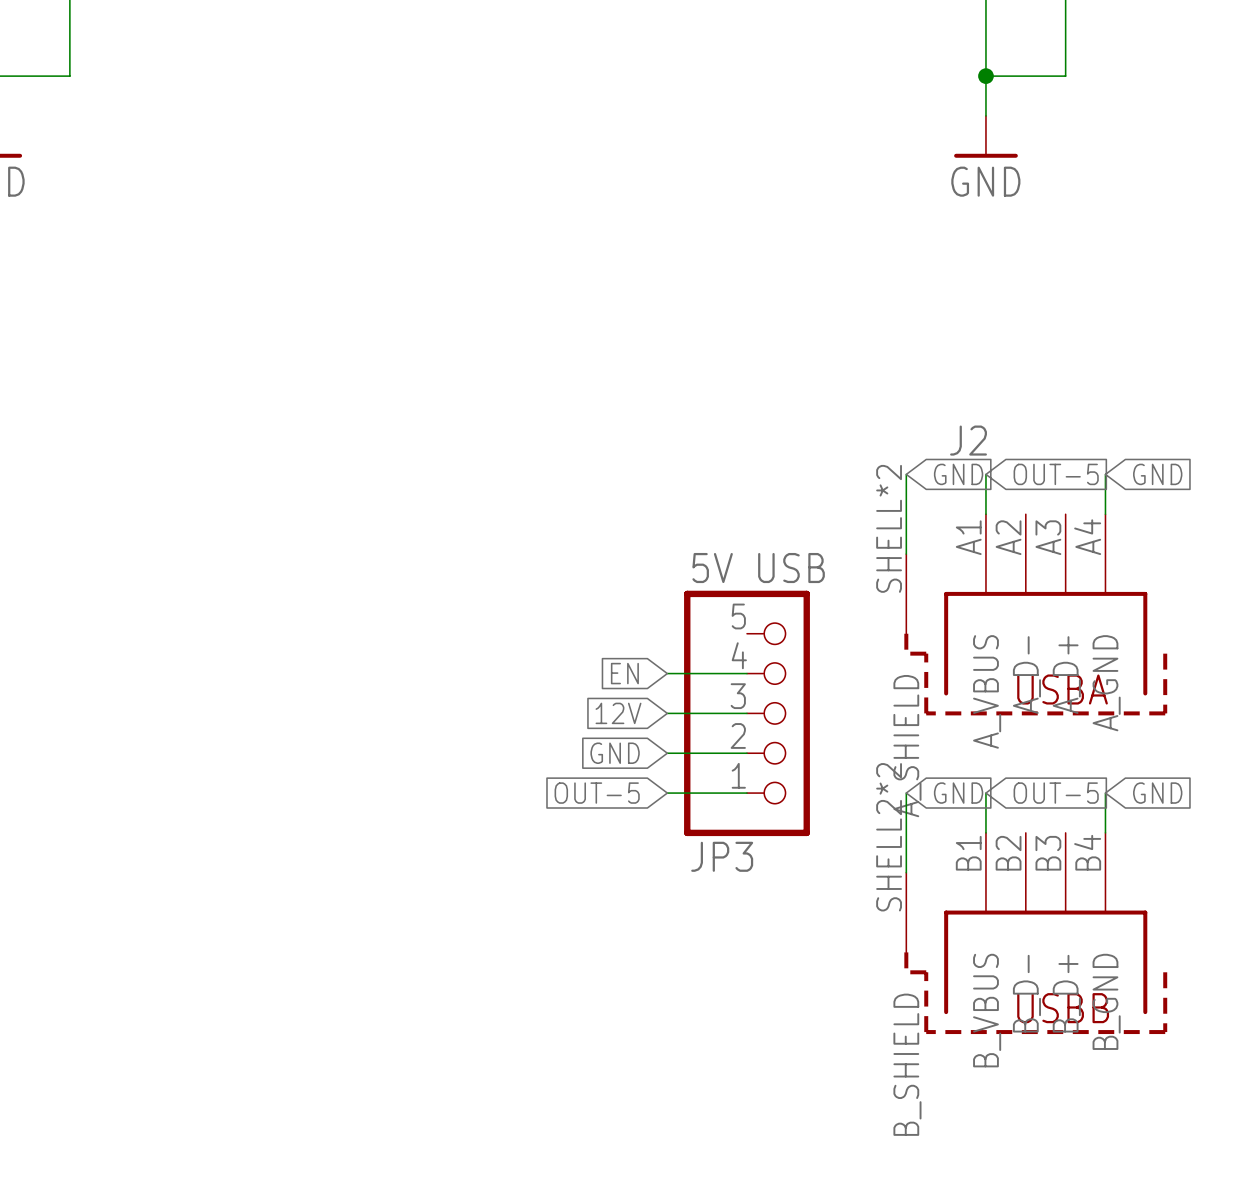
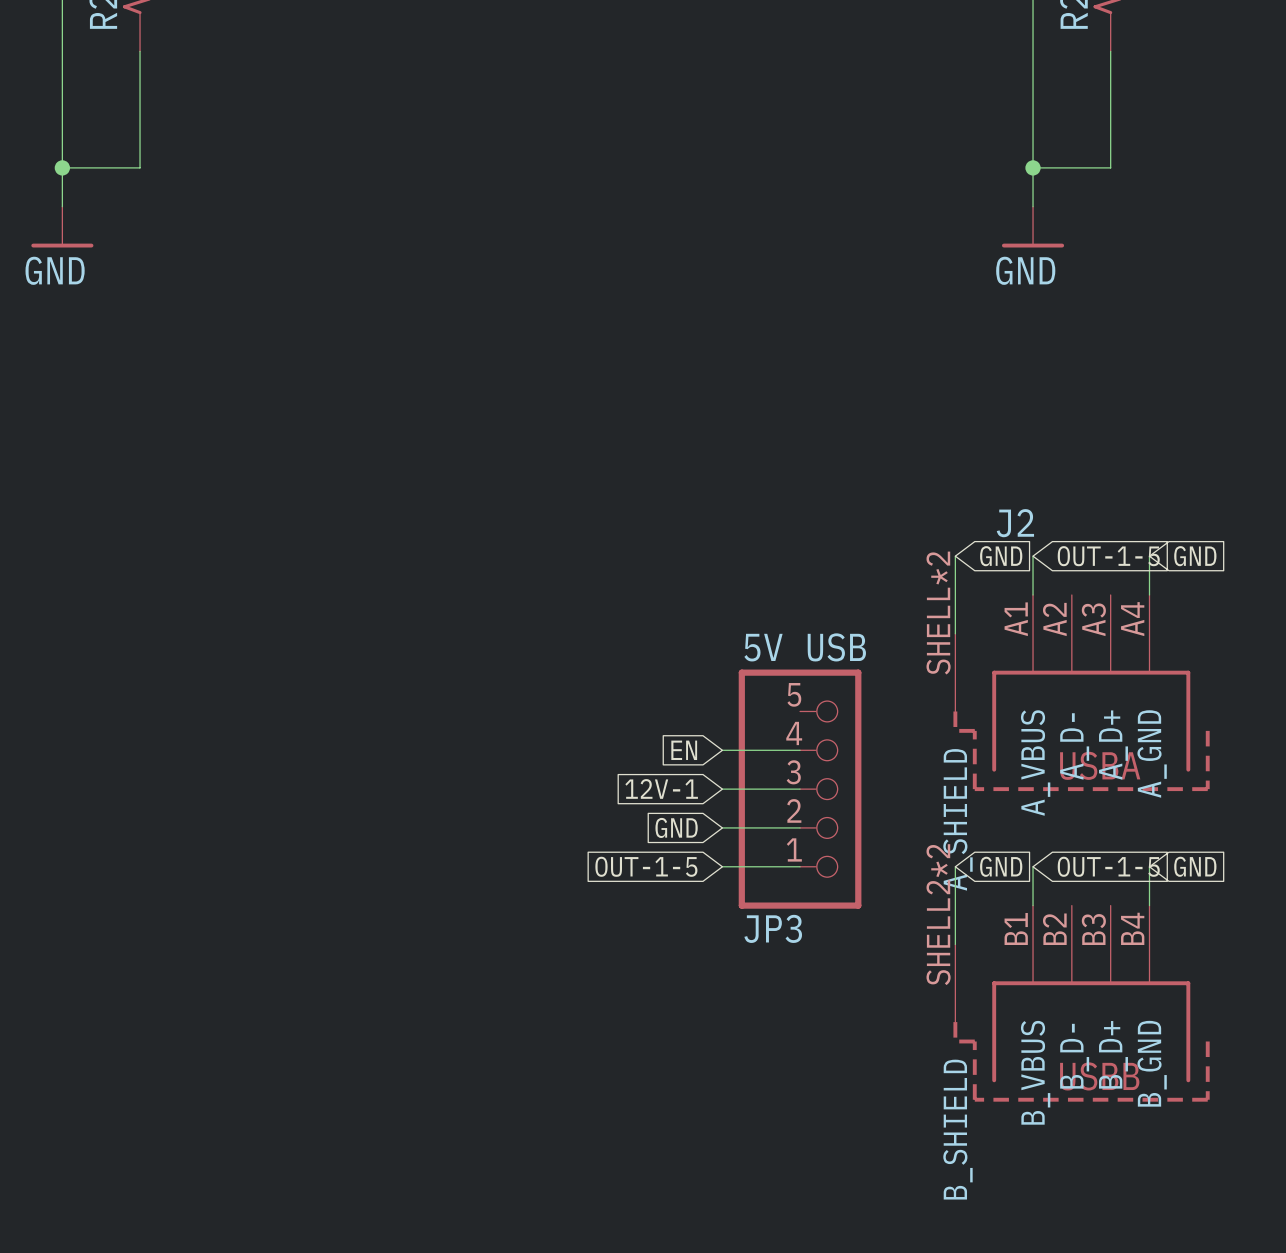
global label: OUT-5 (1056, 474) -> OUT-1-5 (1108, 556)
global label: 12V (618, 713) -> 12V-1 (661, 788)
global label: OUT-5 (597, 793) -> OUT-1-5 (646, 866)
global label: OUT-5 (1056, 793) -> OUT-1-5 (1108, 866)

